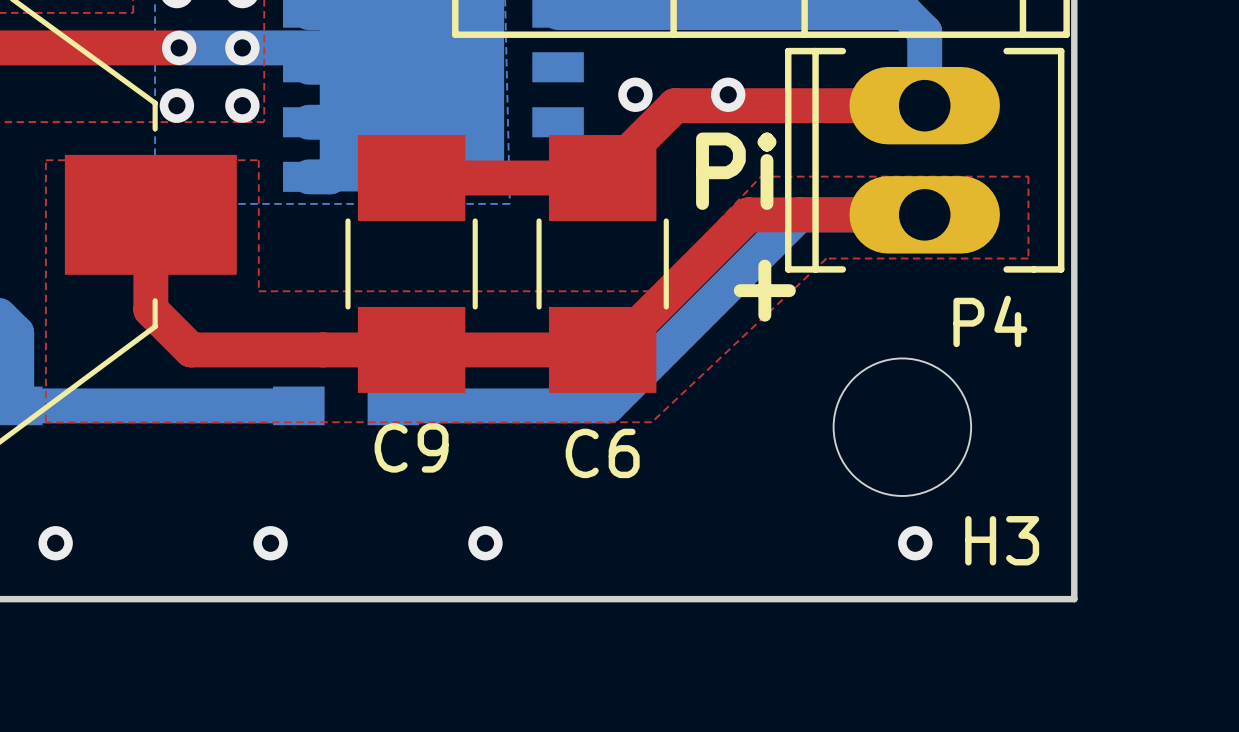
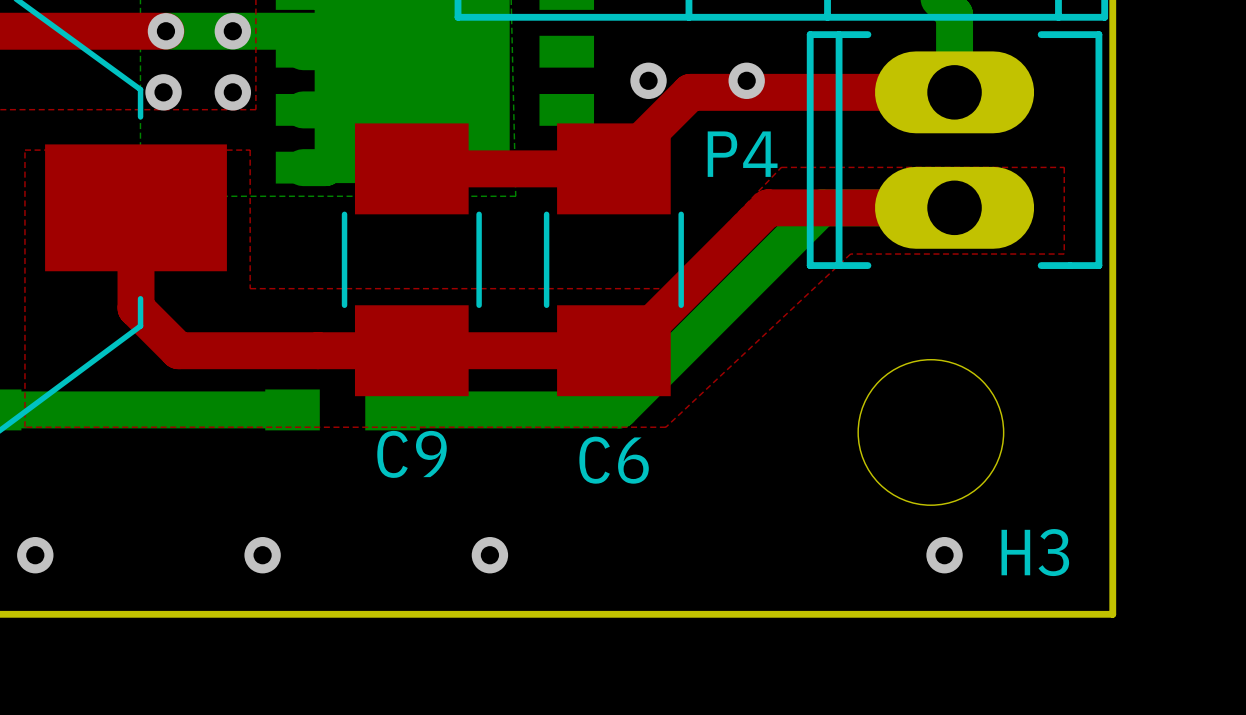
text: Pi (736, 171) -> none
text: + (764, 290) -> none
P4 name position: P4 (990, 321) -> P4 (742, 154)

